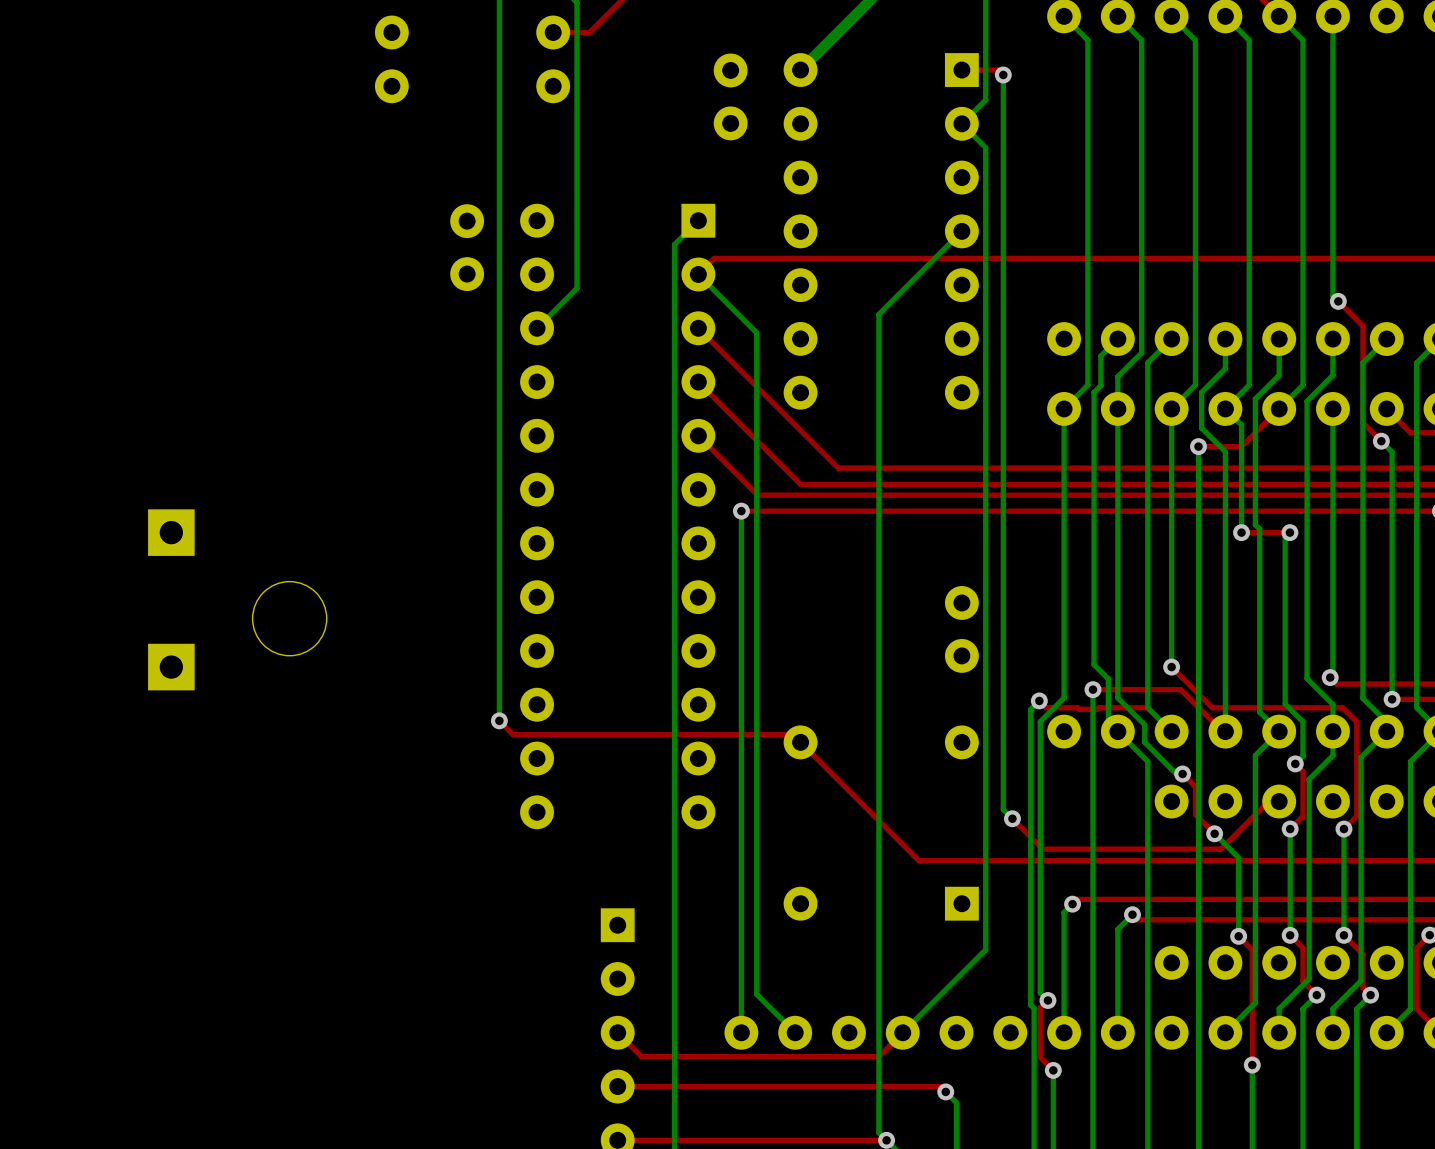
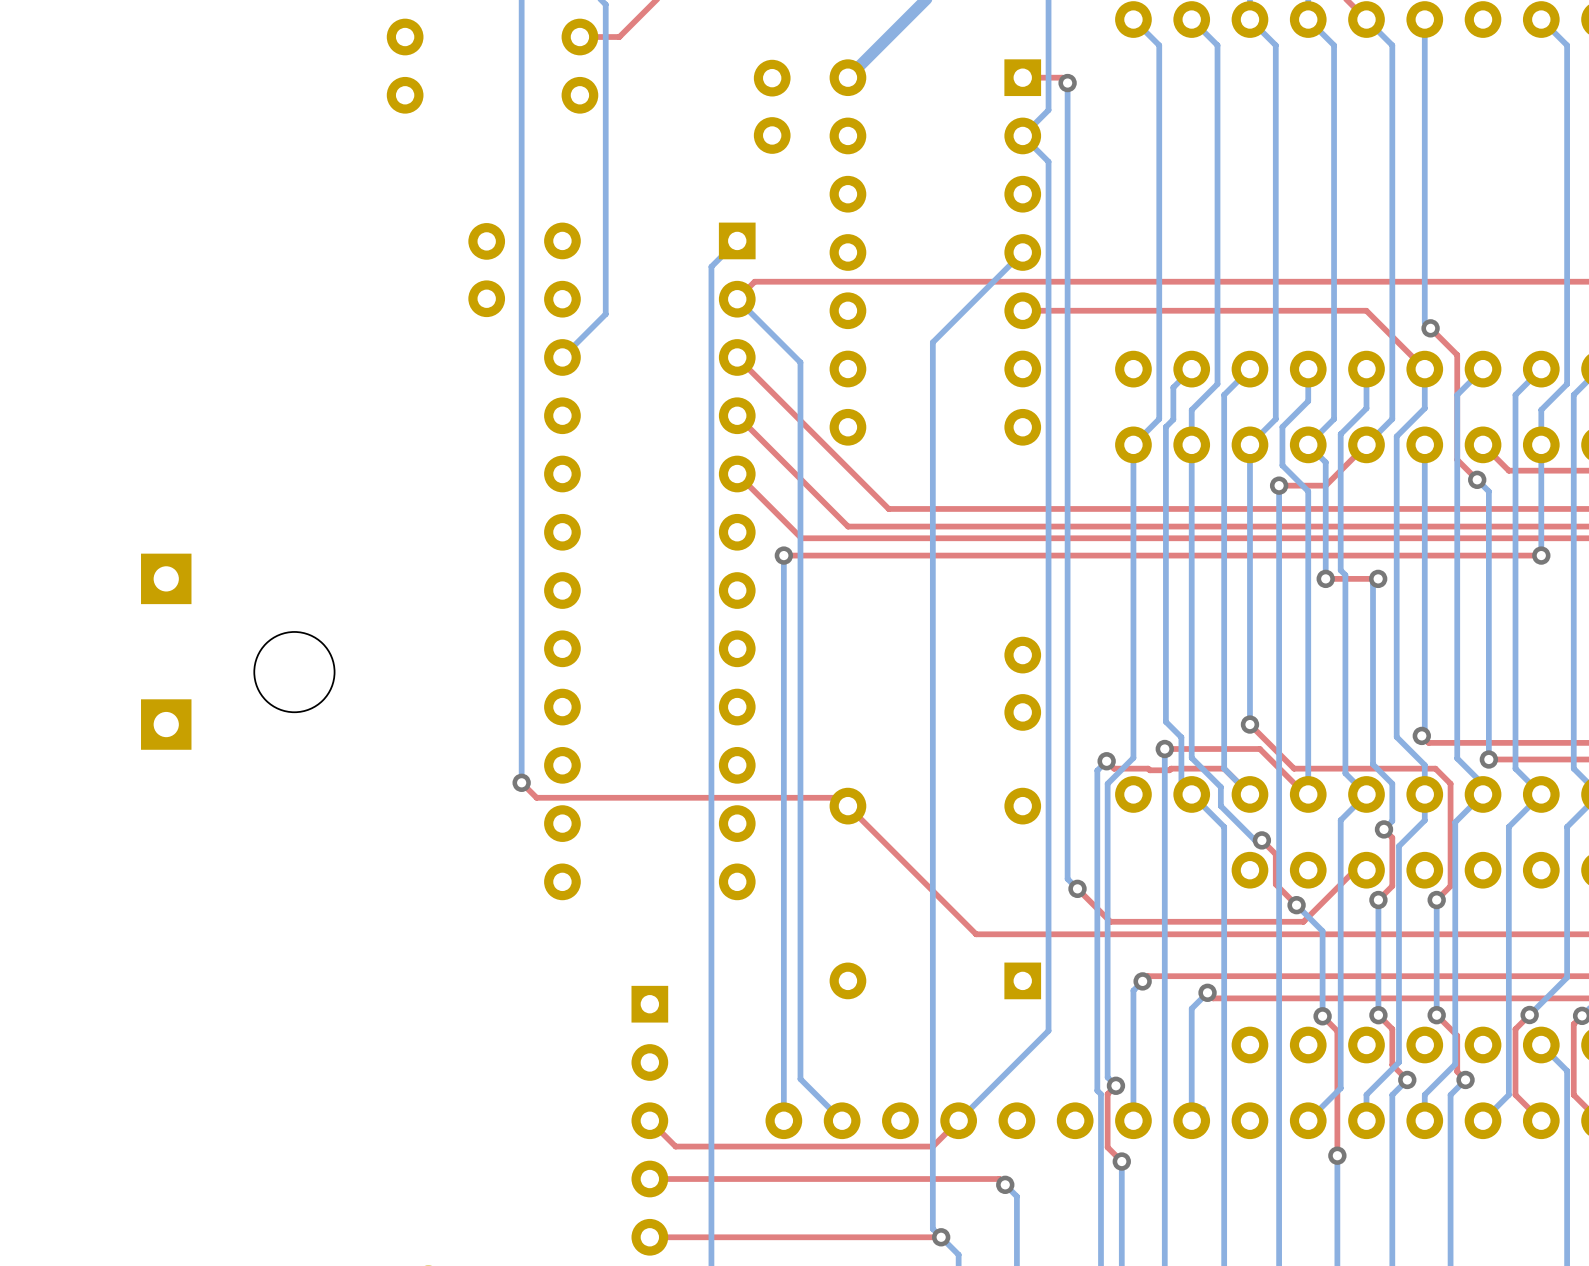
top track: none -> (1022, 310) (1366, 310) (1424, 369)

